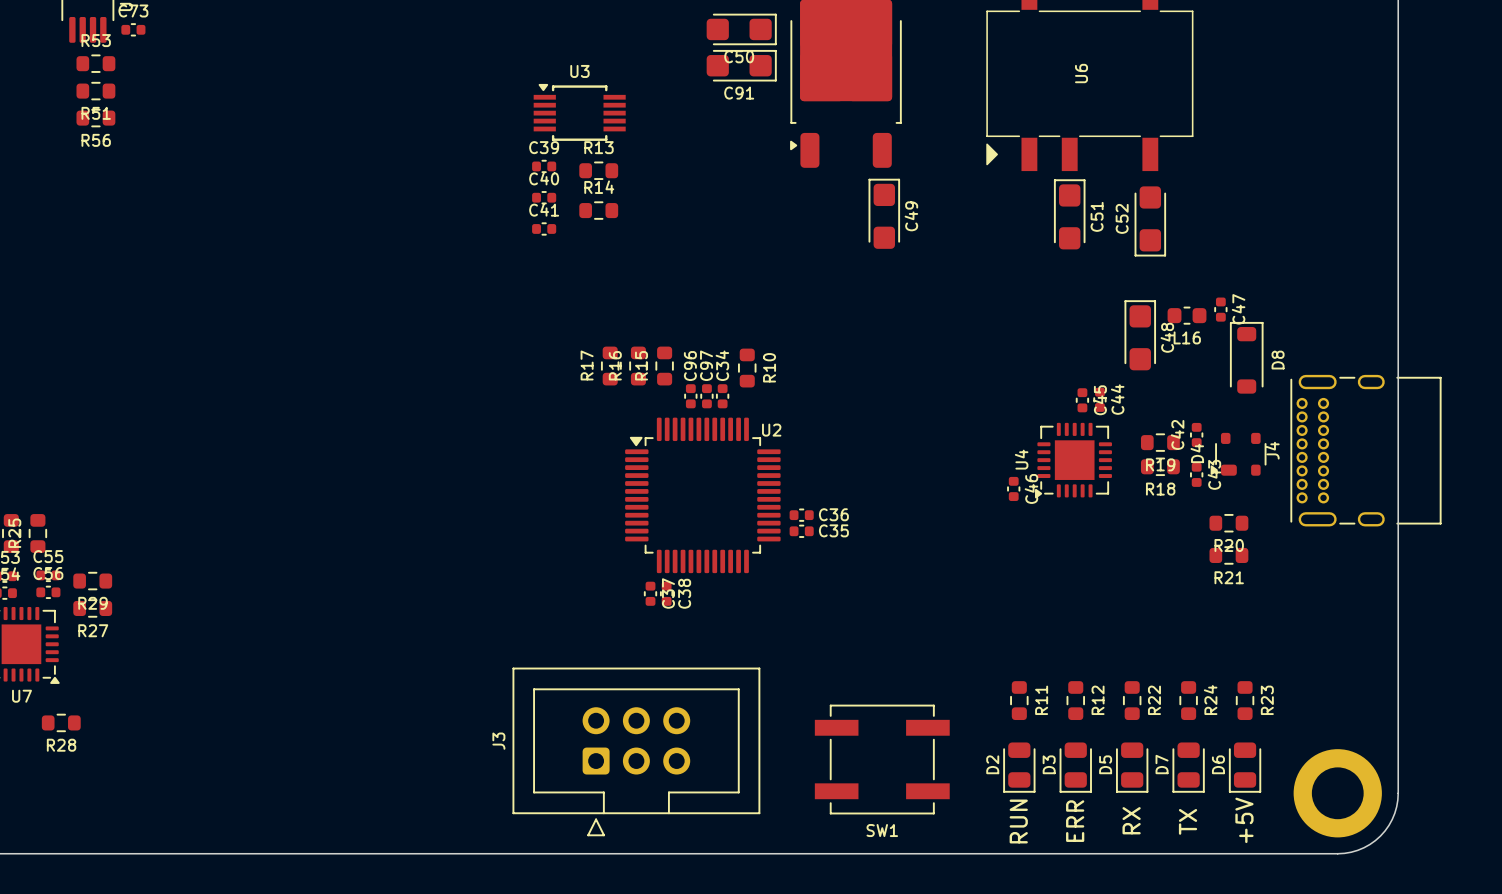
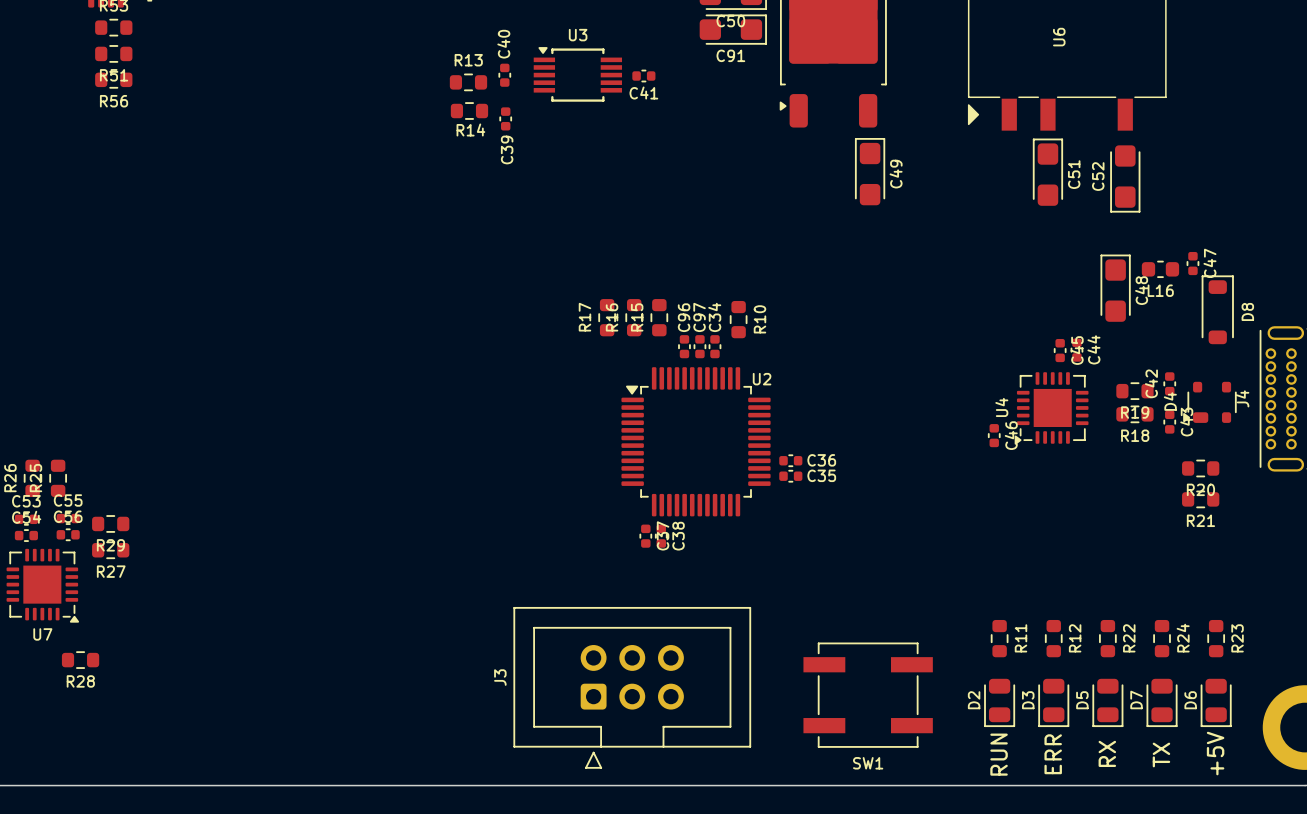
C39 name position: C39 (544, 147) -> C39 (507, 149)
C39 rotation: 0° (544, 166) -> 90° clockwise (505, 118)
C39 position: (544, 166) -> (505, 118)
R13 position: (598, 170) -> (468, 82)
R14 name position: R14 (599, 187) -> R14 (470, 129)
C40 rotation: 0° (544, 197) -> 90° clockwise (504, 75)
C40 position: (544, 197) -> (504, 75)
C41 name position: C41 (544, 209) -> C41 (643, 93)
R14 position: (598, 210) -> (469, 111)
C41 position: (544, 228) -> (643, 76)

